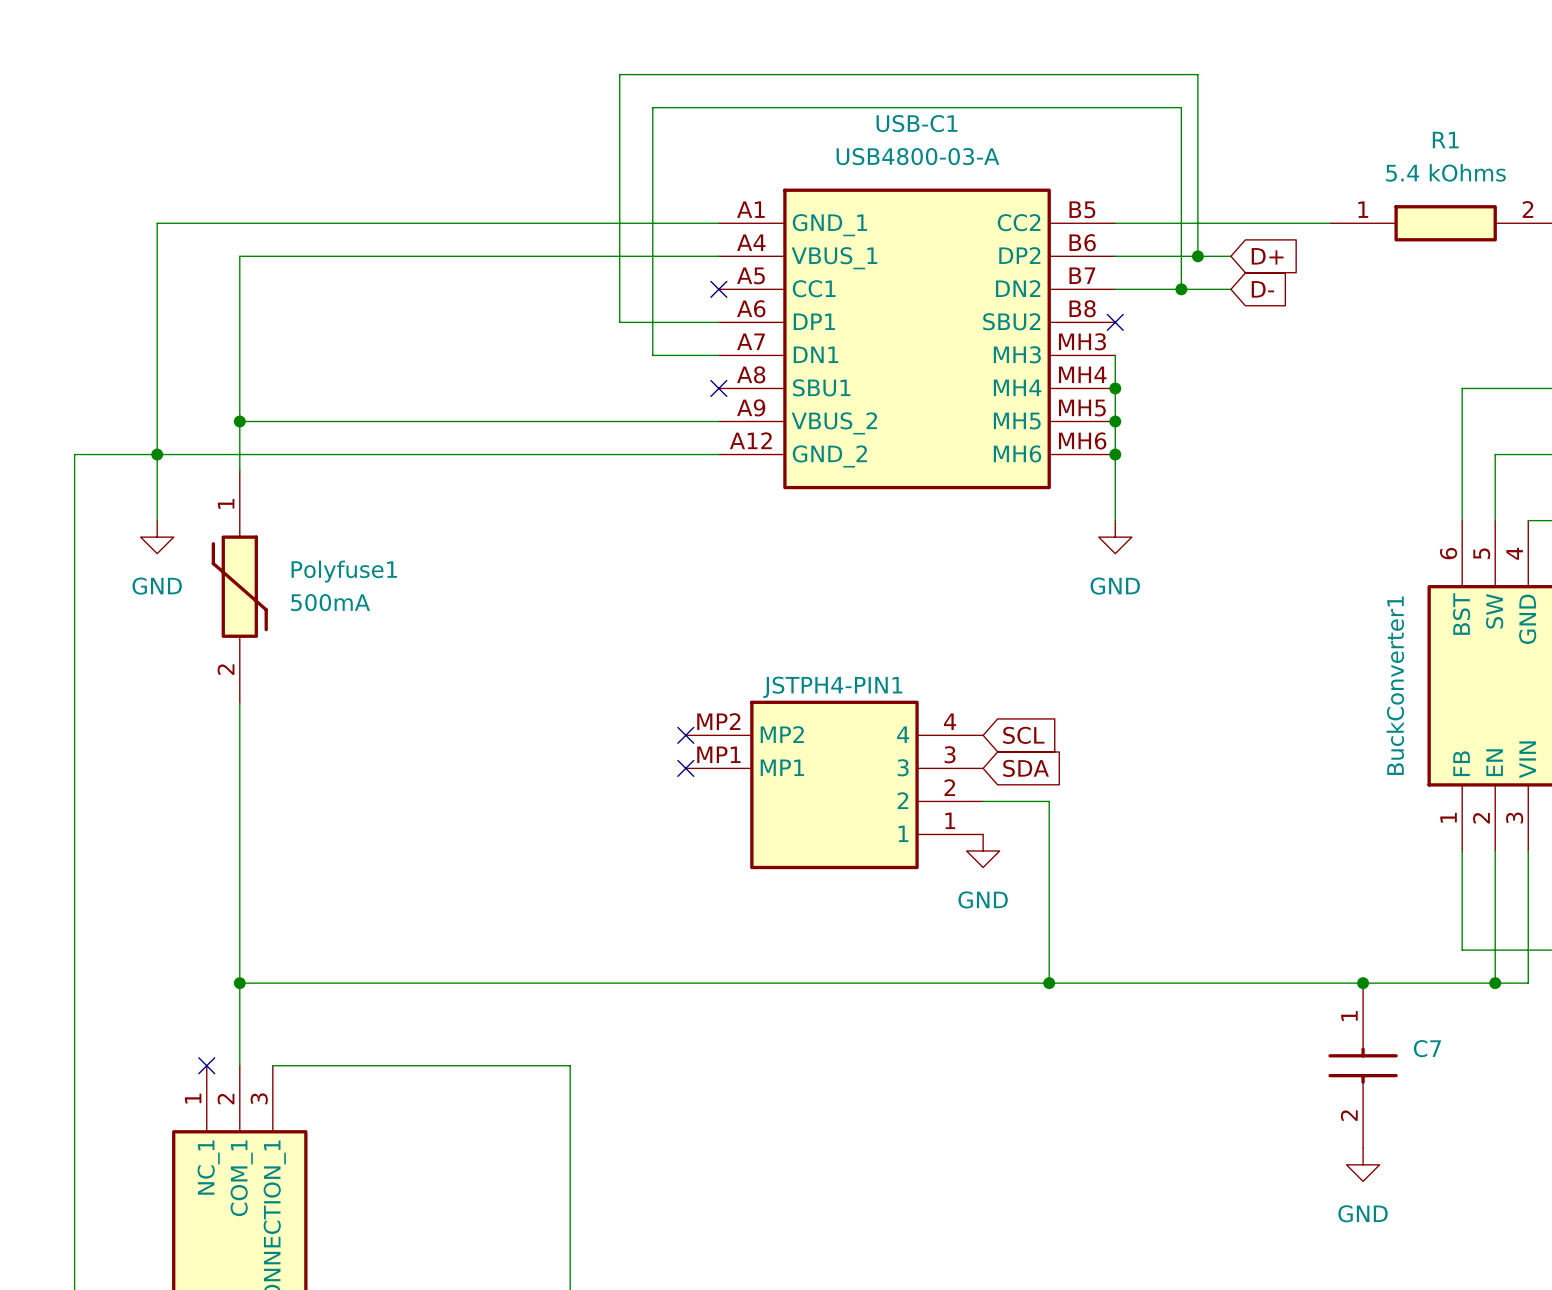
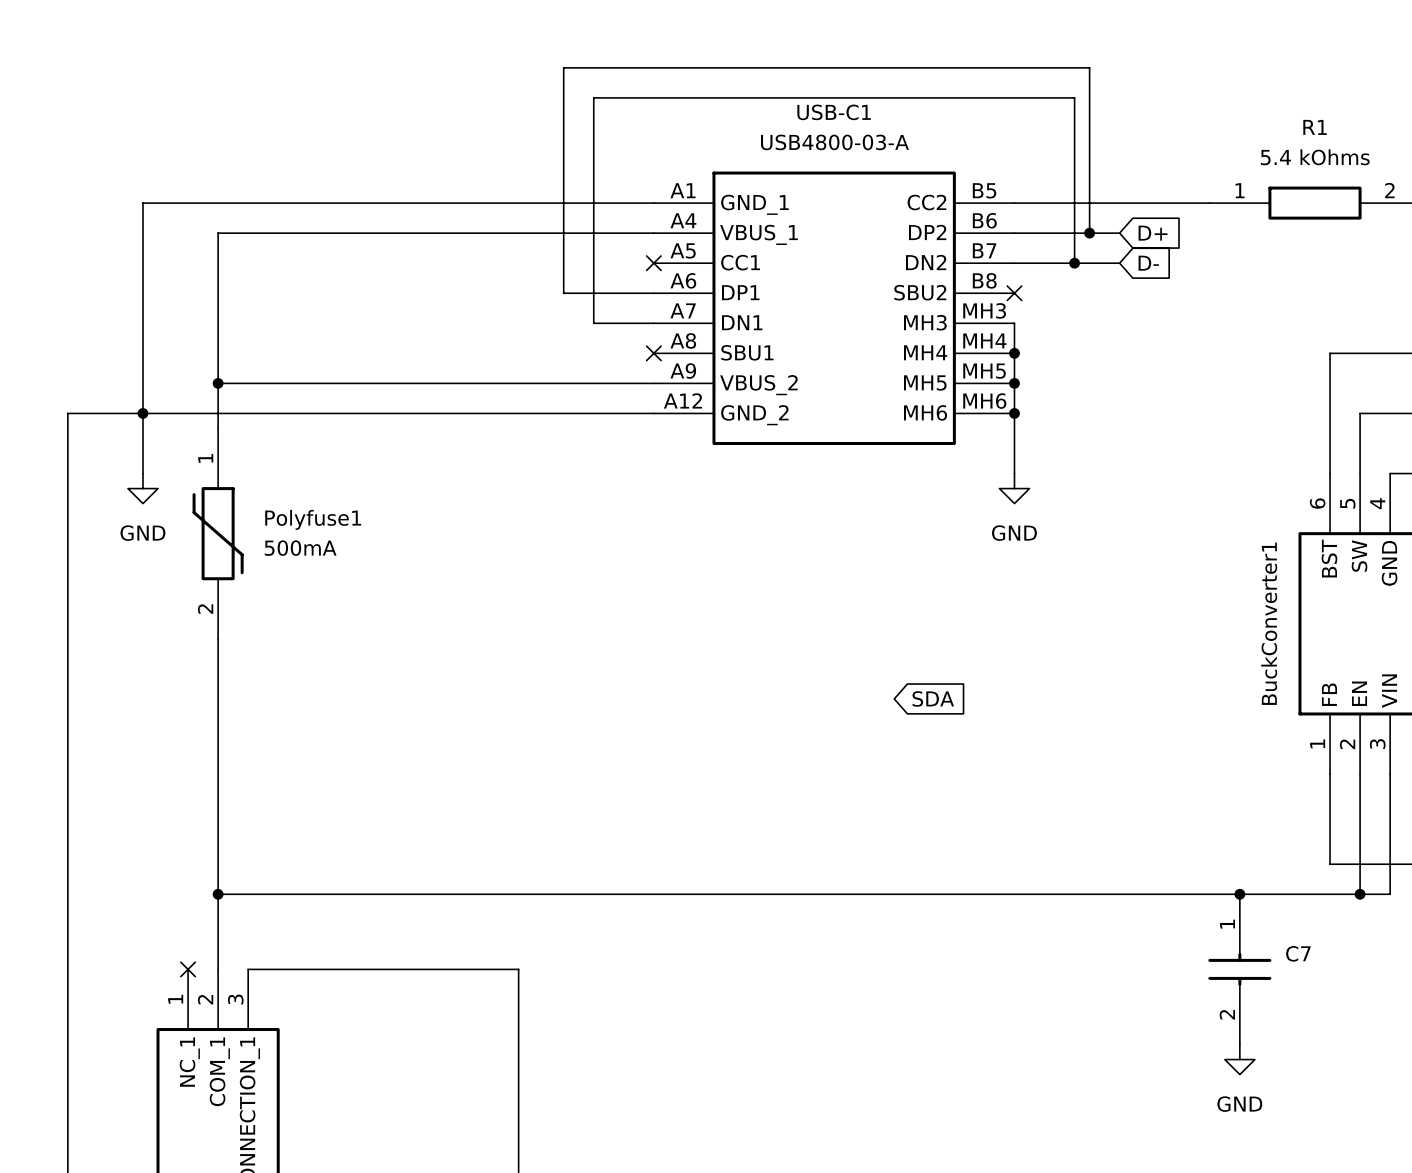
no-connect mark: (685, 735) -> none
global label: SCL (1023, 735) -> none
no-connect mark: (685, 768) -> none
JSTPH4-PIN1: (834, 784) -> none
wire: (983, 801) (1049, 801) (1049, 983) -> none
power symbol: GND (983, 850) -> none
junction: (1049, 983) -> none

